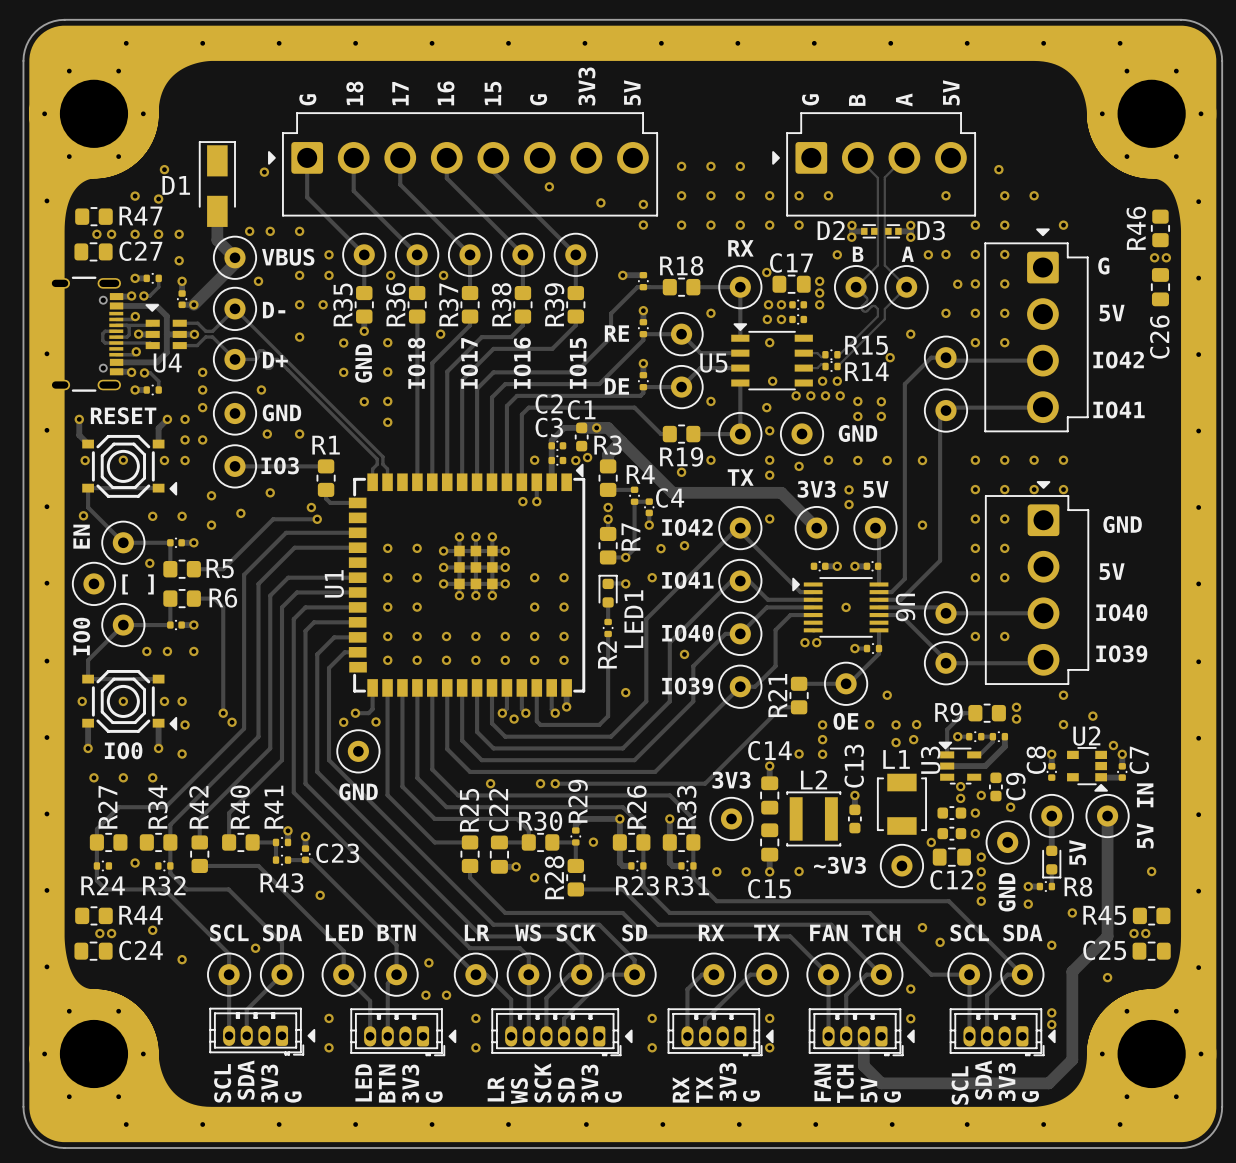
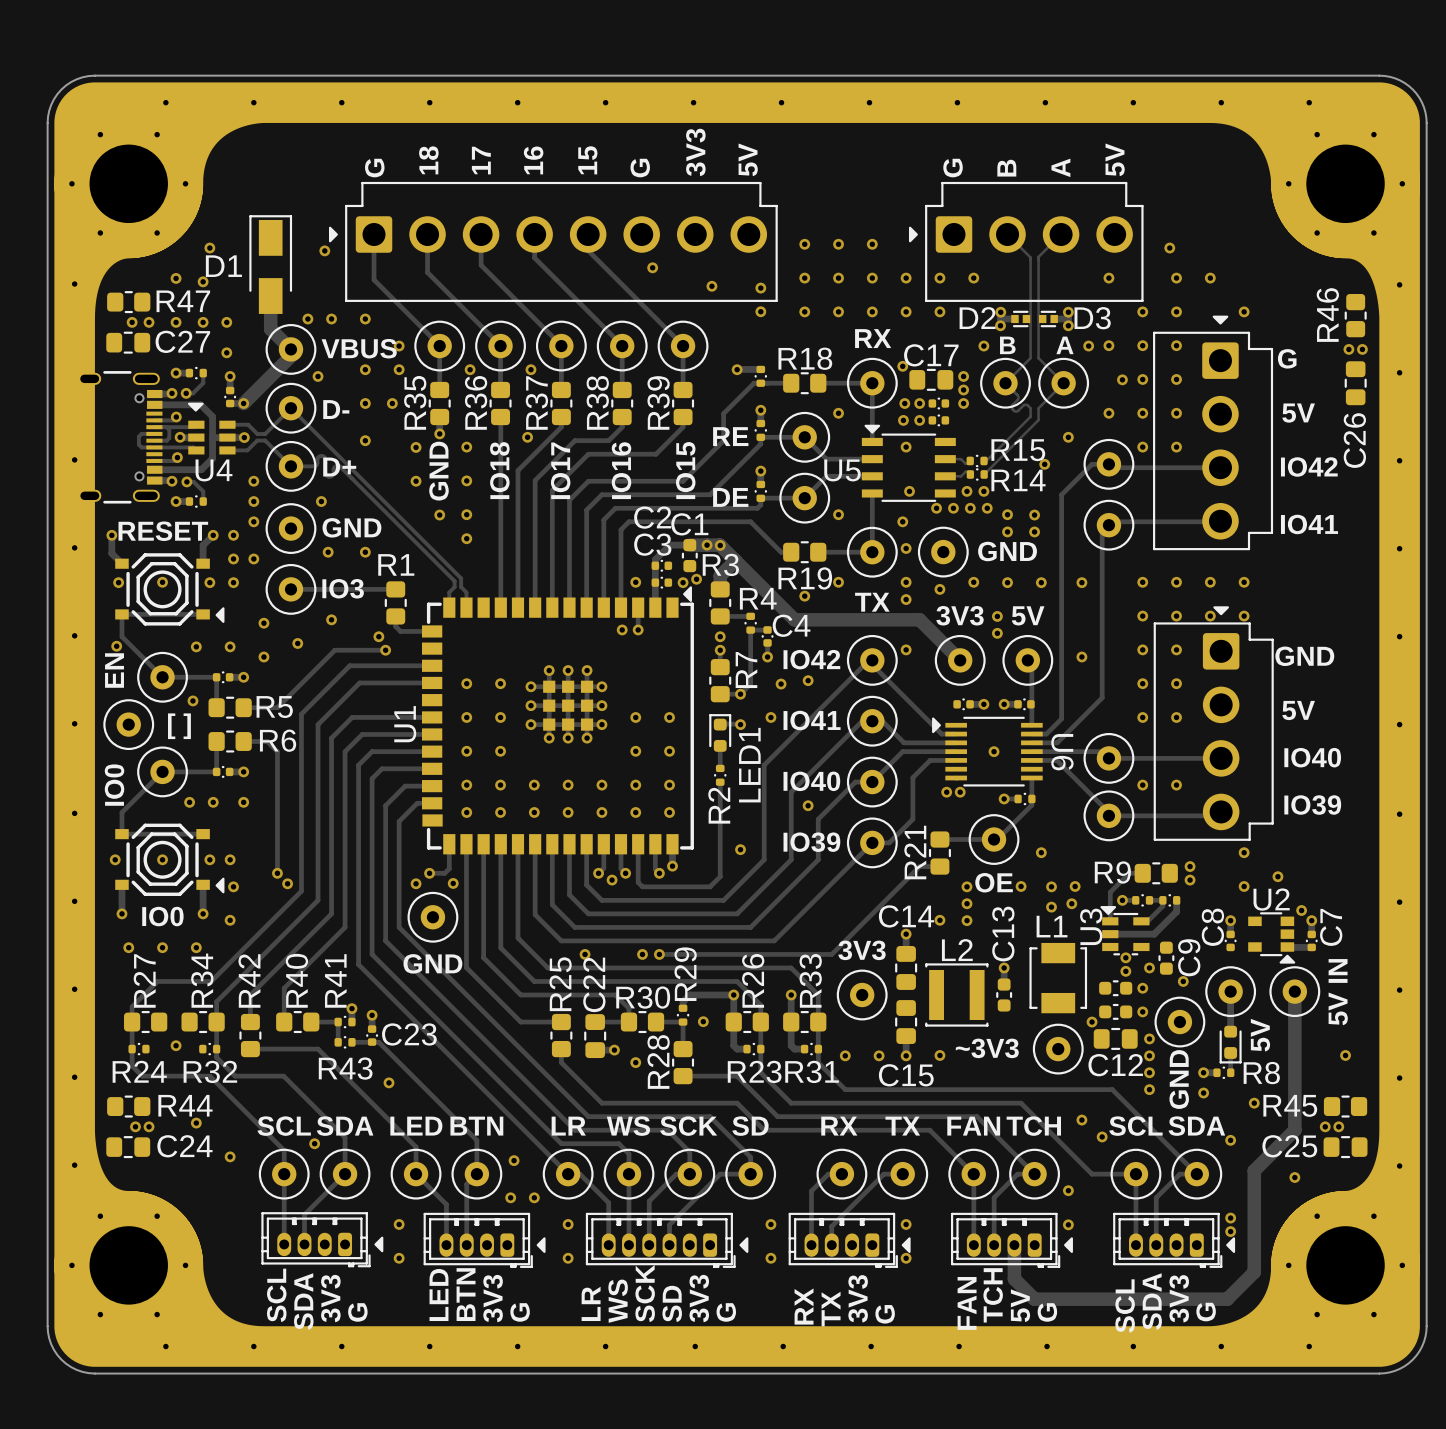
via: none -> (720, 545)

